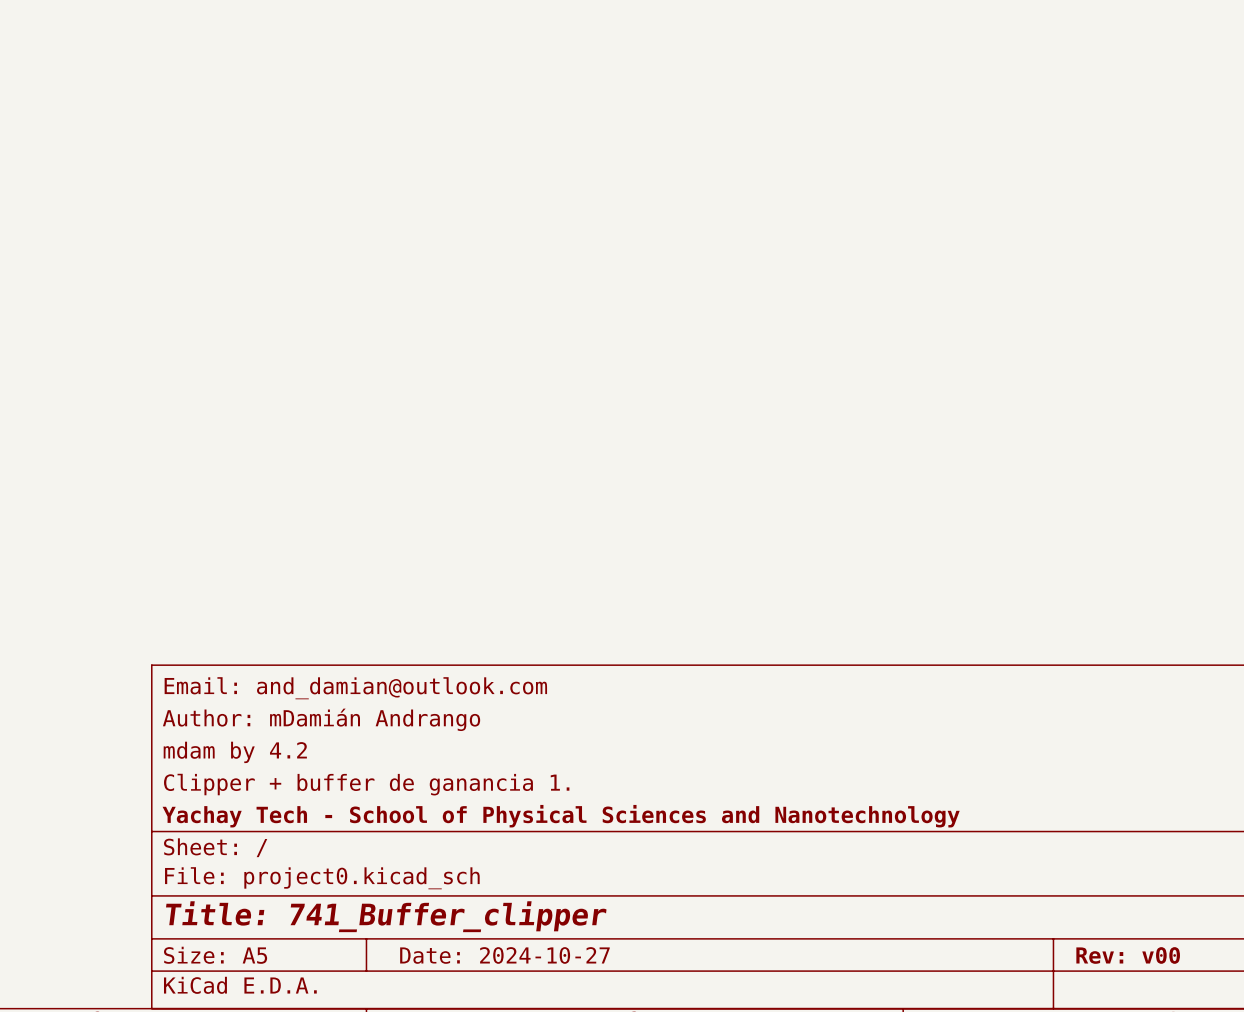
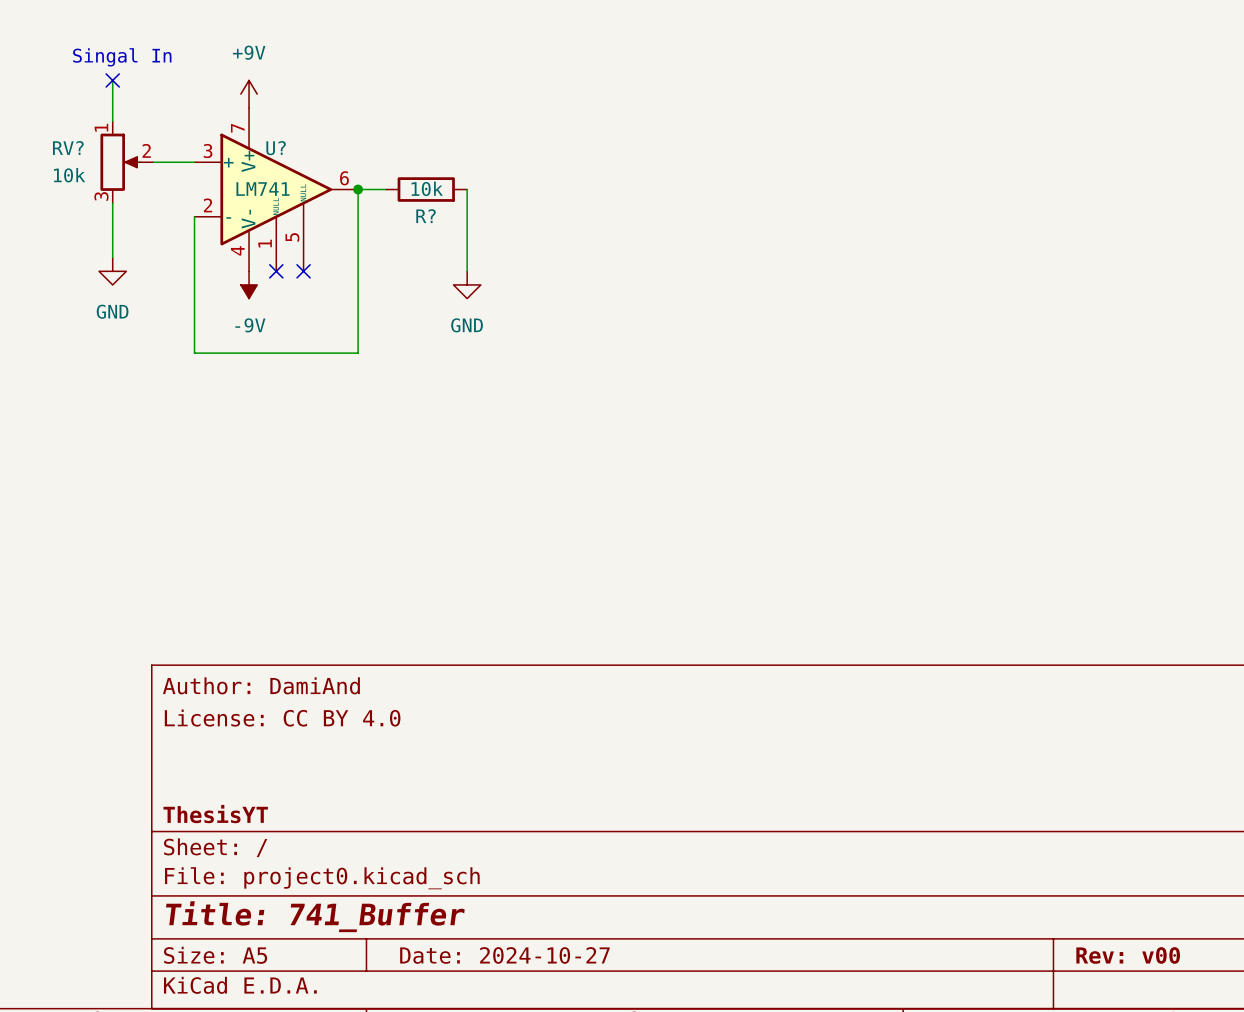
text: none -> Singal In (122, 57)
wire: none -> (112, 80) (112, 121)
no-connect mark: none -> (112, 80)
power symbol: none -> +9V (249, 94)
RV?: none -> 10k (127, 162)
wire: none -> (153, 162) (194, 162)
U?: none -> LM741 (276, 189)
junction: none -> (358, 189)
wire: none -> (385, 189) (358, 189) (358, 353) (194, 353) (194, 216)
R?: none -> 10k (426, 189)
wire: none -> (467, 189) (467, 271)
wire: none -> (112, 203) (112, 257)
power symbol: none -> GND (112, 271)
no-connect mark: none -> (276, 271)
no-connect mark: none -> (303, 271)
power symbol: none -> -9V (249, 284)
power symbol: none -> GND (467, 284)
title block: Email: and_damian@outlook.com (355, 688) -> Author: DamiAnd (261, 685)
title block: Author: mDamián Andrango (321, 719) -> License: CC BY 4.0 (282, 718)
title block: mdam by 4.2 (235, 752) -> none
title block: Clipper + buffer de ganancia 1. (366, 784) -> none
title block: Yachay Tech - School of Physical Sciences and Nanotechnology (561, 816) -> ThesisYT (215, 814)
title block: Title: 741_Buffer_clipper (386, 916) -> Title: 741_Buffer (315, 916)

